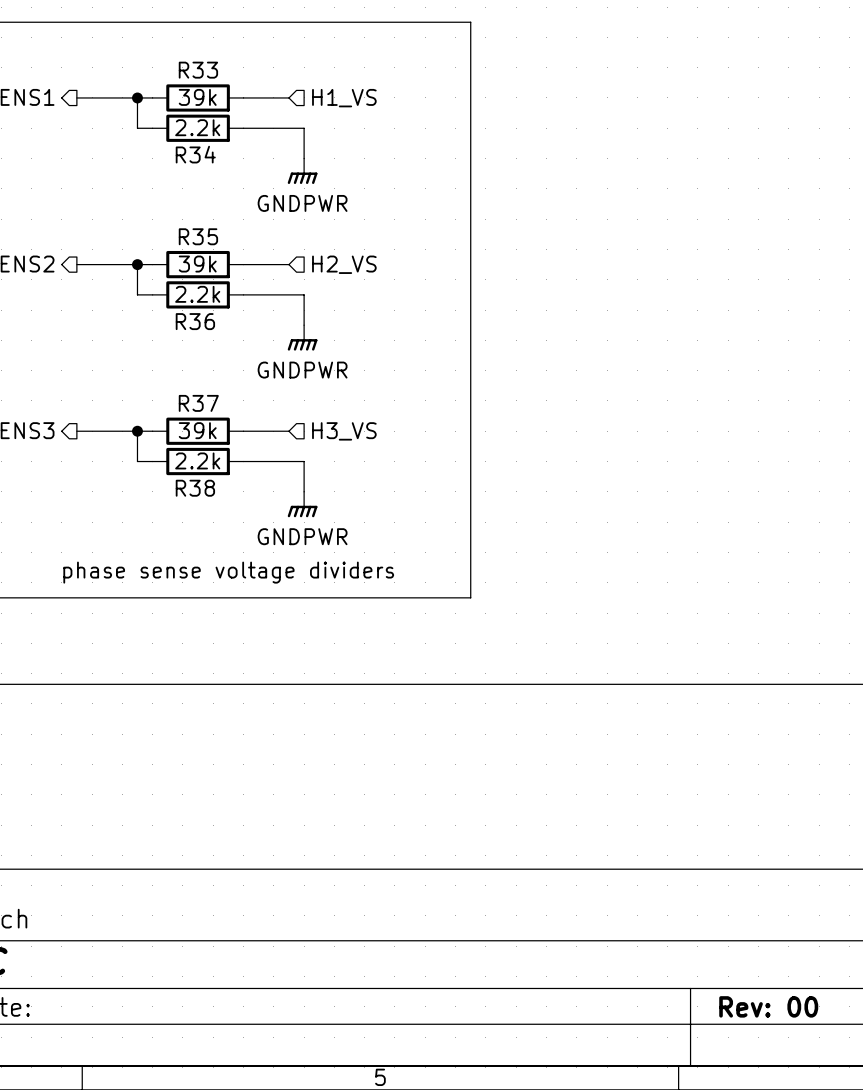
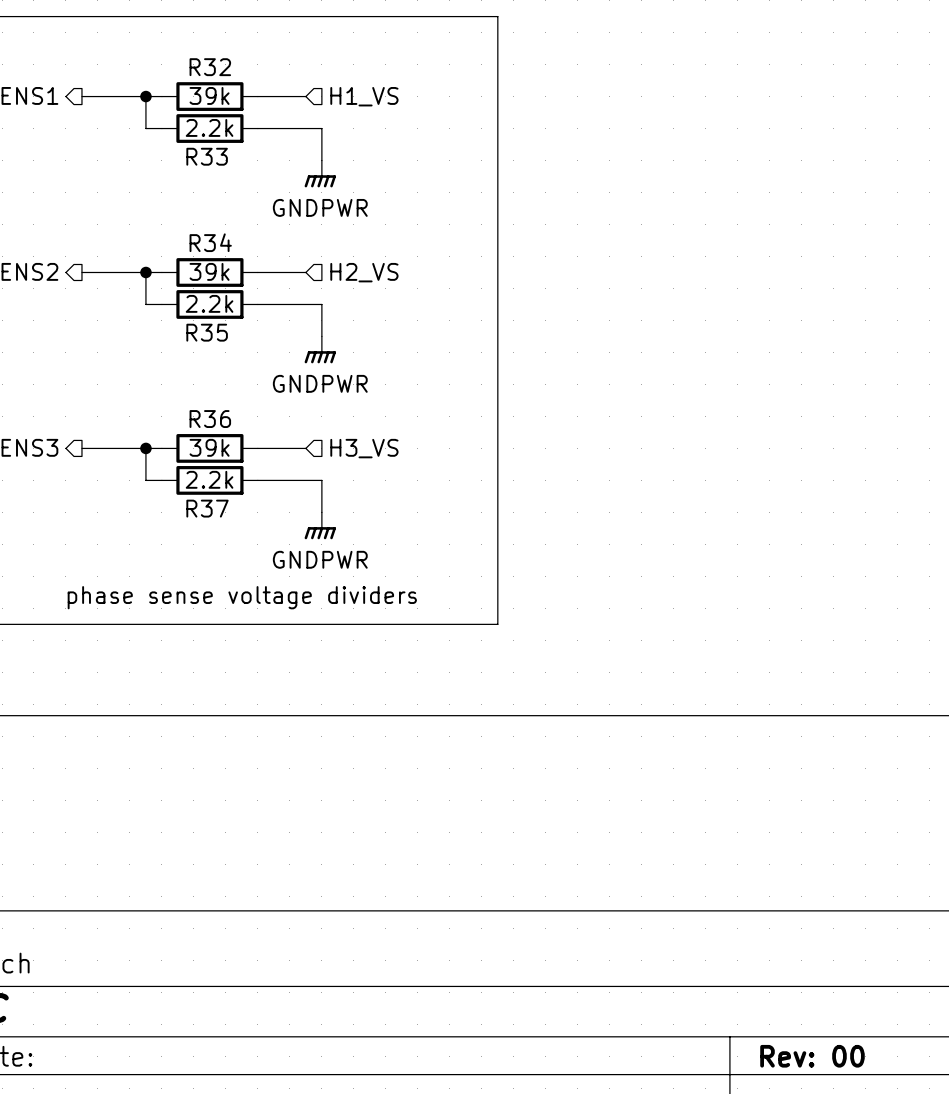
R33 name: R33 (198, 70) -> R32 (210, 67)
R34 name: R34 (195, 154) -> R33 (207, 156)
R35 name: R35 (198, 236) -> R34 (210, 242)
R36 name: R36 (195, 321) -> R35 (207, 332)
R37 name: R37 (198, 403) -> R36 (210, 419)
R38 name: R38 (195, 488) -> R37 (207, 508)

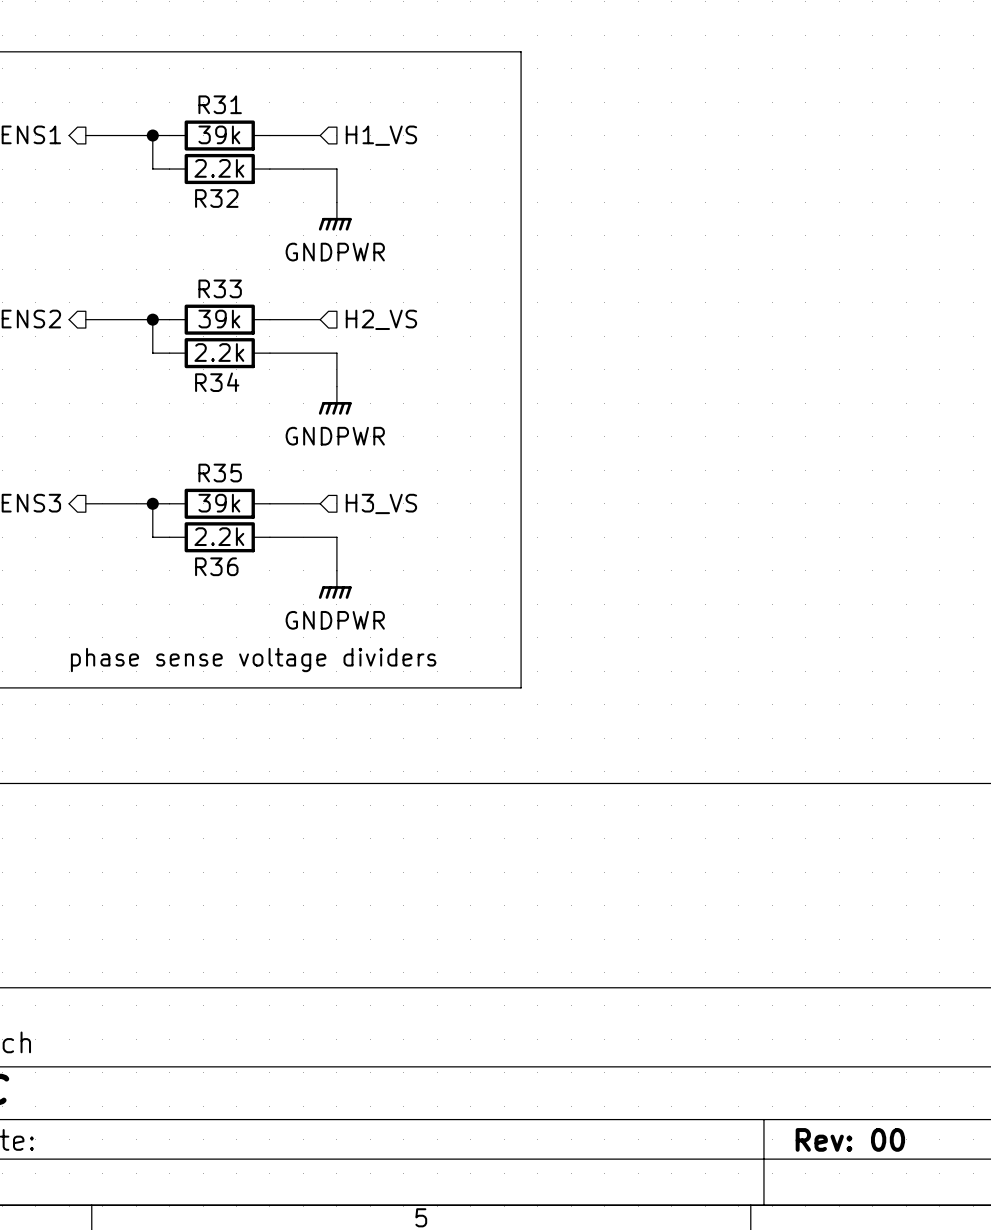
R32 name: R32 (210, 67) -> R31 (220, 104)
R33 name: R33 (207, 156) -> R32 (216, 198)
R34 name: R34 (210, 242) -> R33 (220, 288)
R35 name: R35 (207, 332) -> R34 (217, 382)
R36 name: R36 (210, 419) -> R35 (220, 473)
R37 name: R37 (207, 508) -> R36 (216, 566)

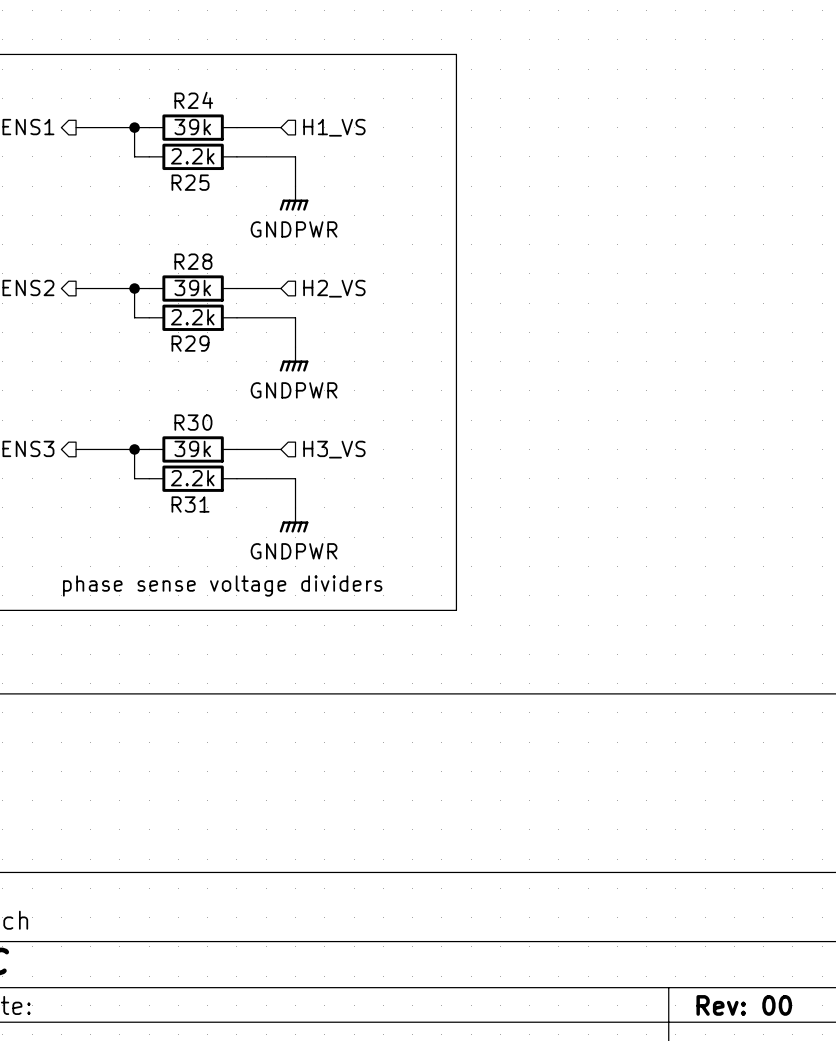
R31 name: R31 (220, 104) -> R24 (193, 100)
R32 name: R32 (216, 198) -> R25 (190, 182)
R33 name: R33 (220, 288) -> R28 (193, 261)
R34 name: R34 (217, 382) -> R29 (190, 343)
R35 name: R35 (220, 473) -> R30 (193, 422)
R36 name: R36 (216, 566) -> R31 (190, 504)

